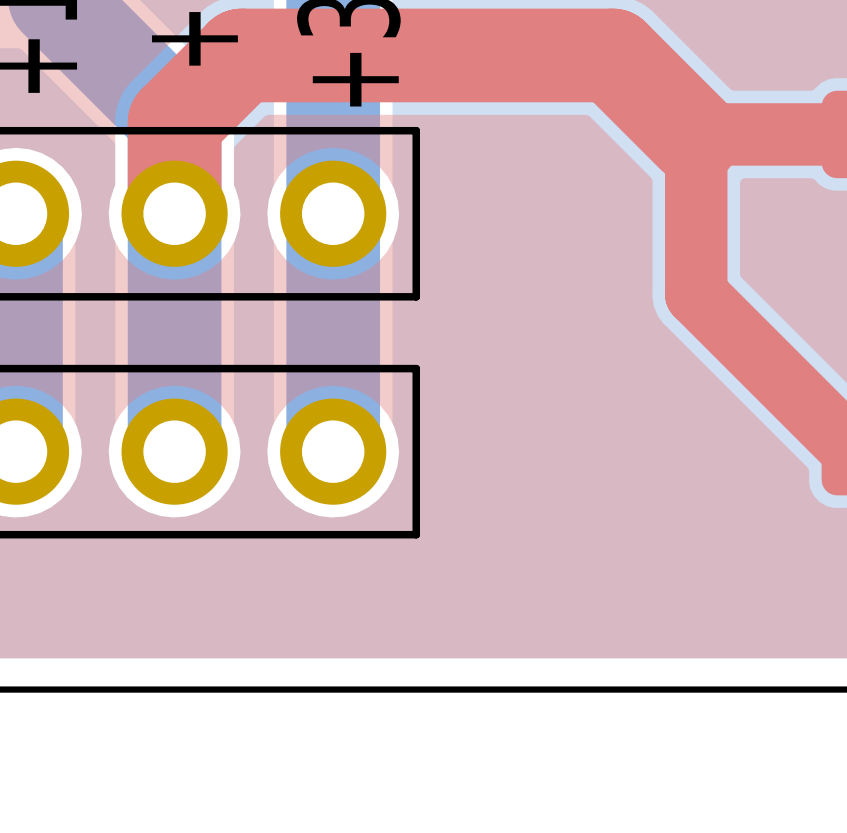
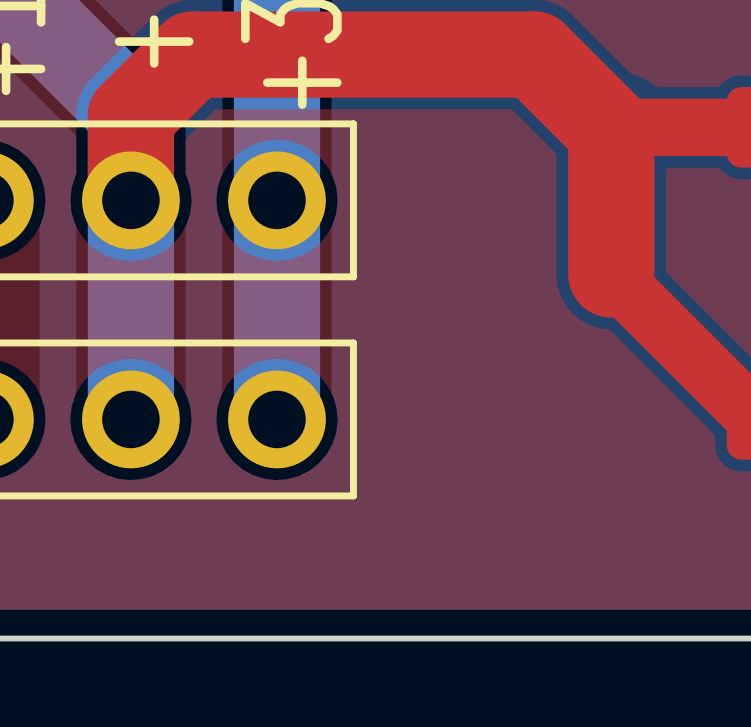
top track width: thin (696, 142) (696, 294) -> thick (611, 135) (611, 274)

